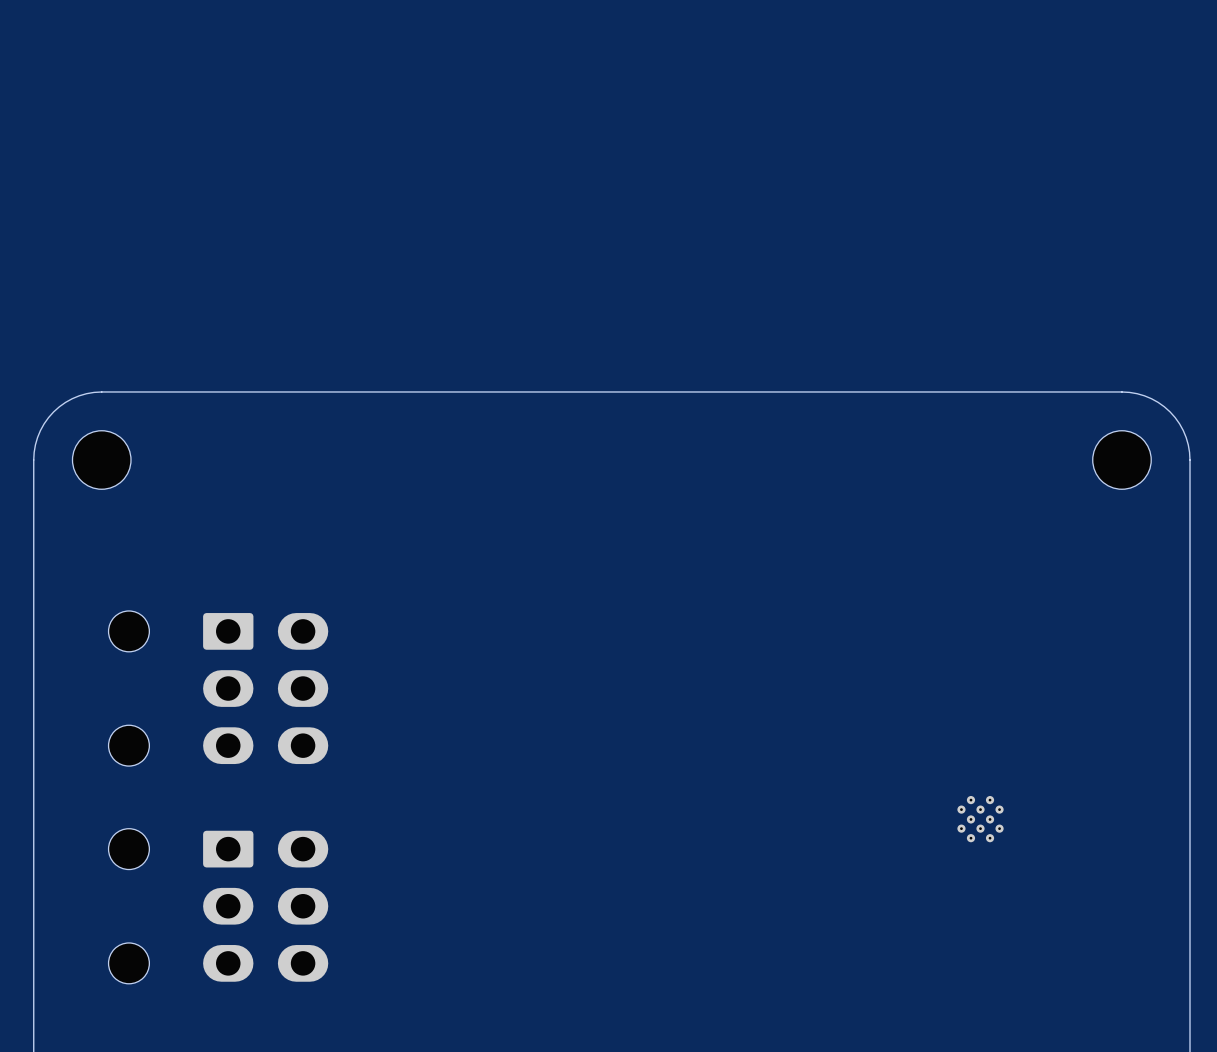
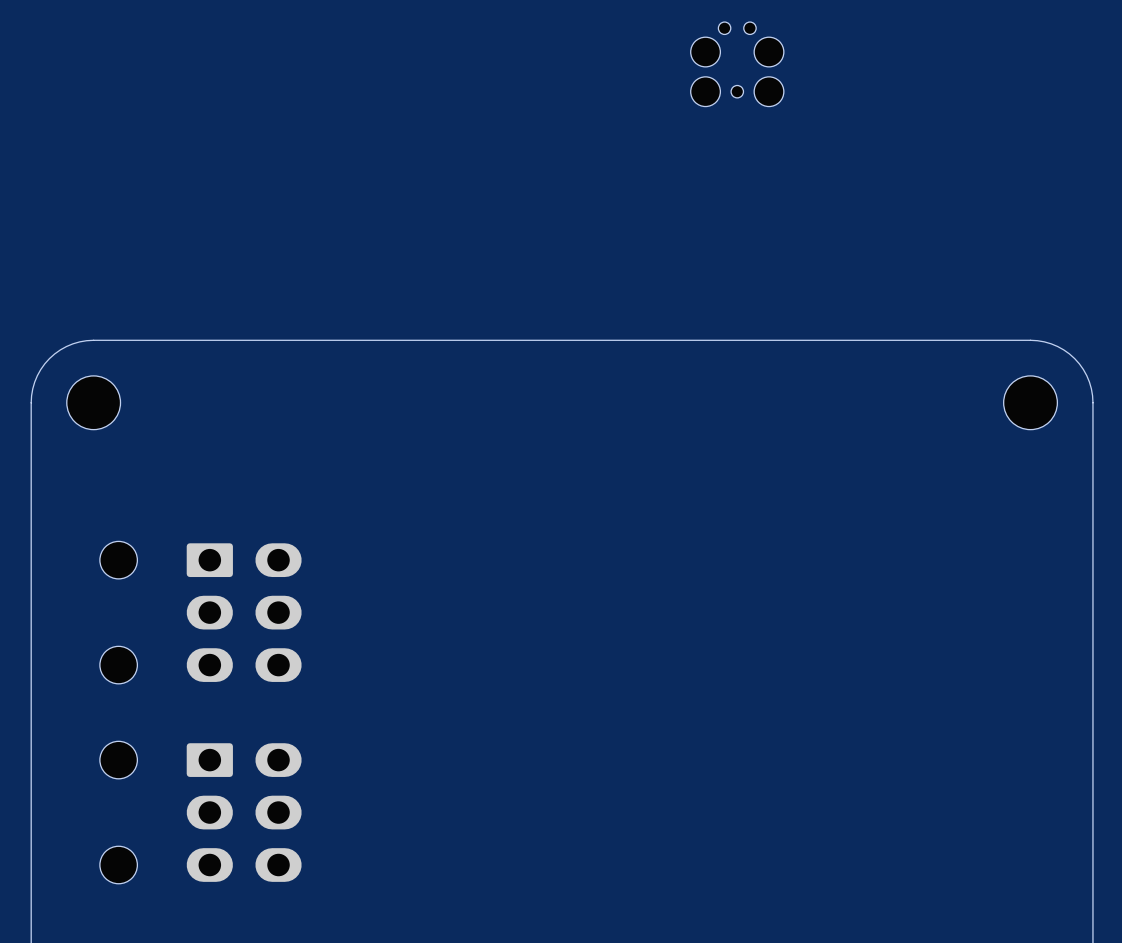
part: none -> (737, 64)
part: (980, 819) -> none

